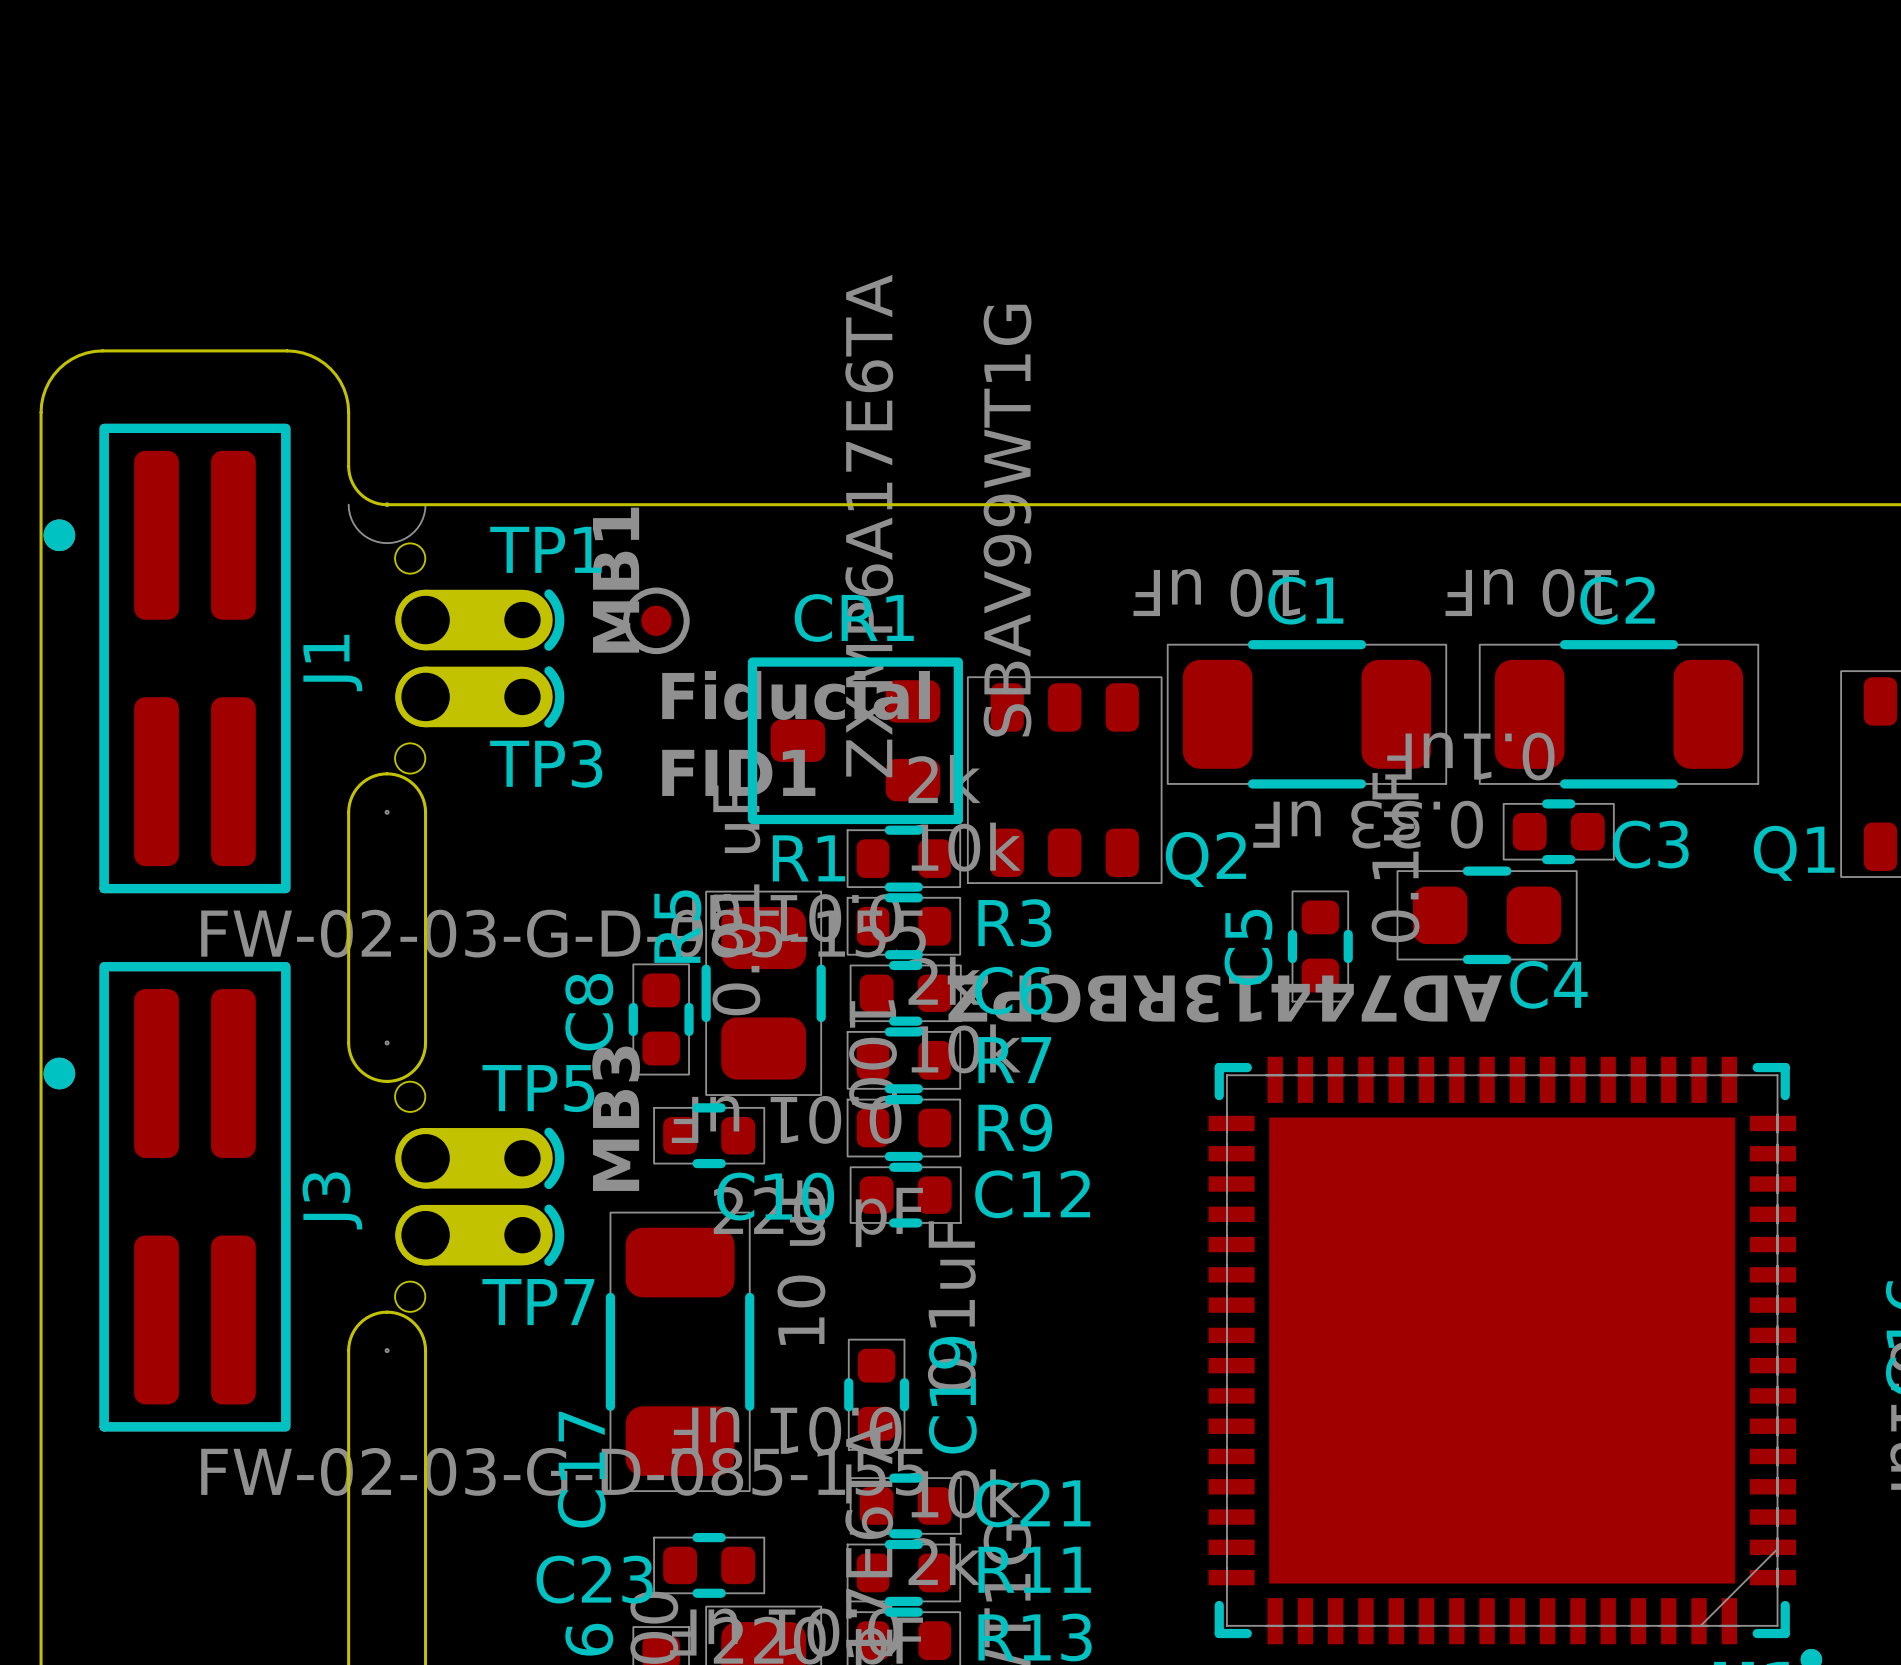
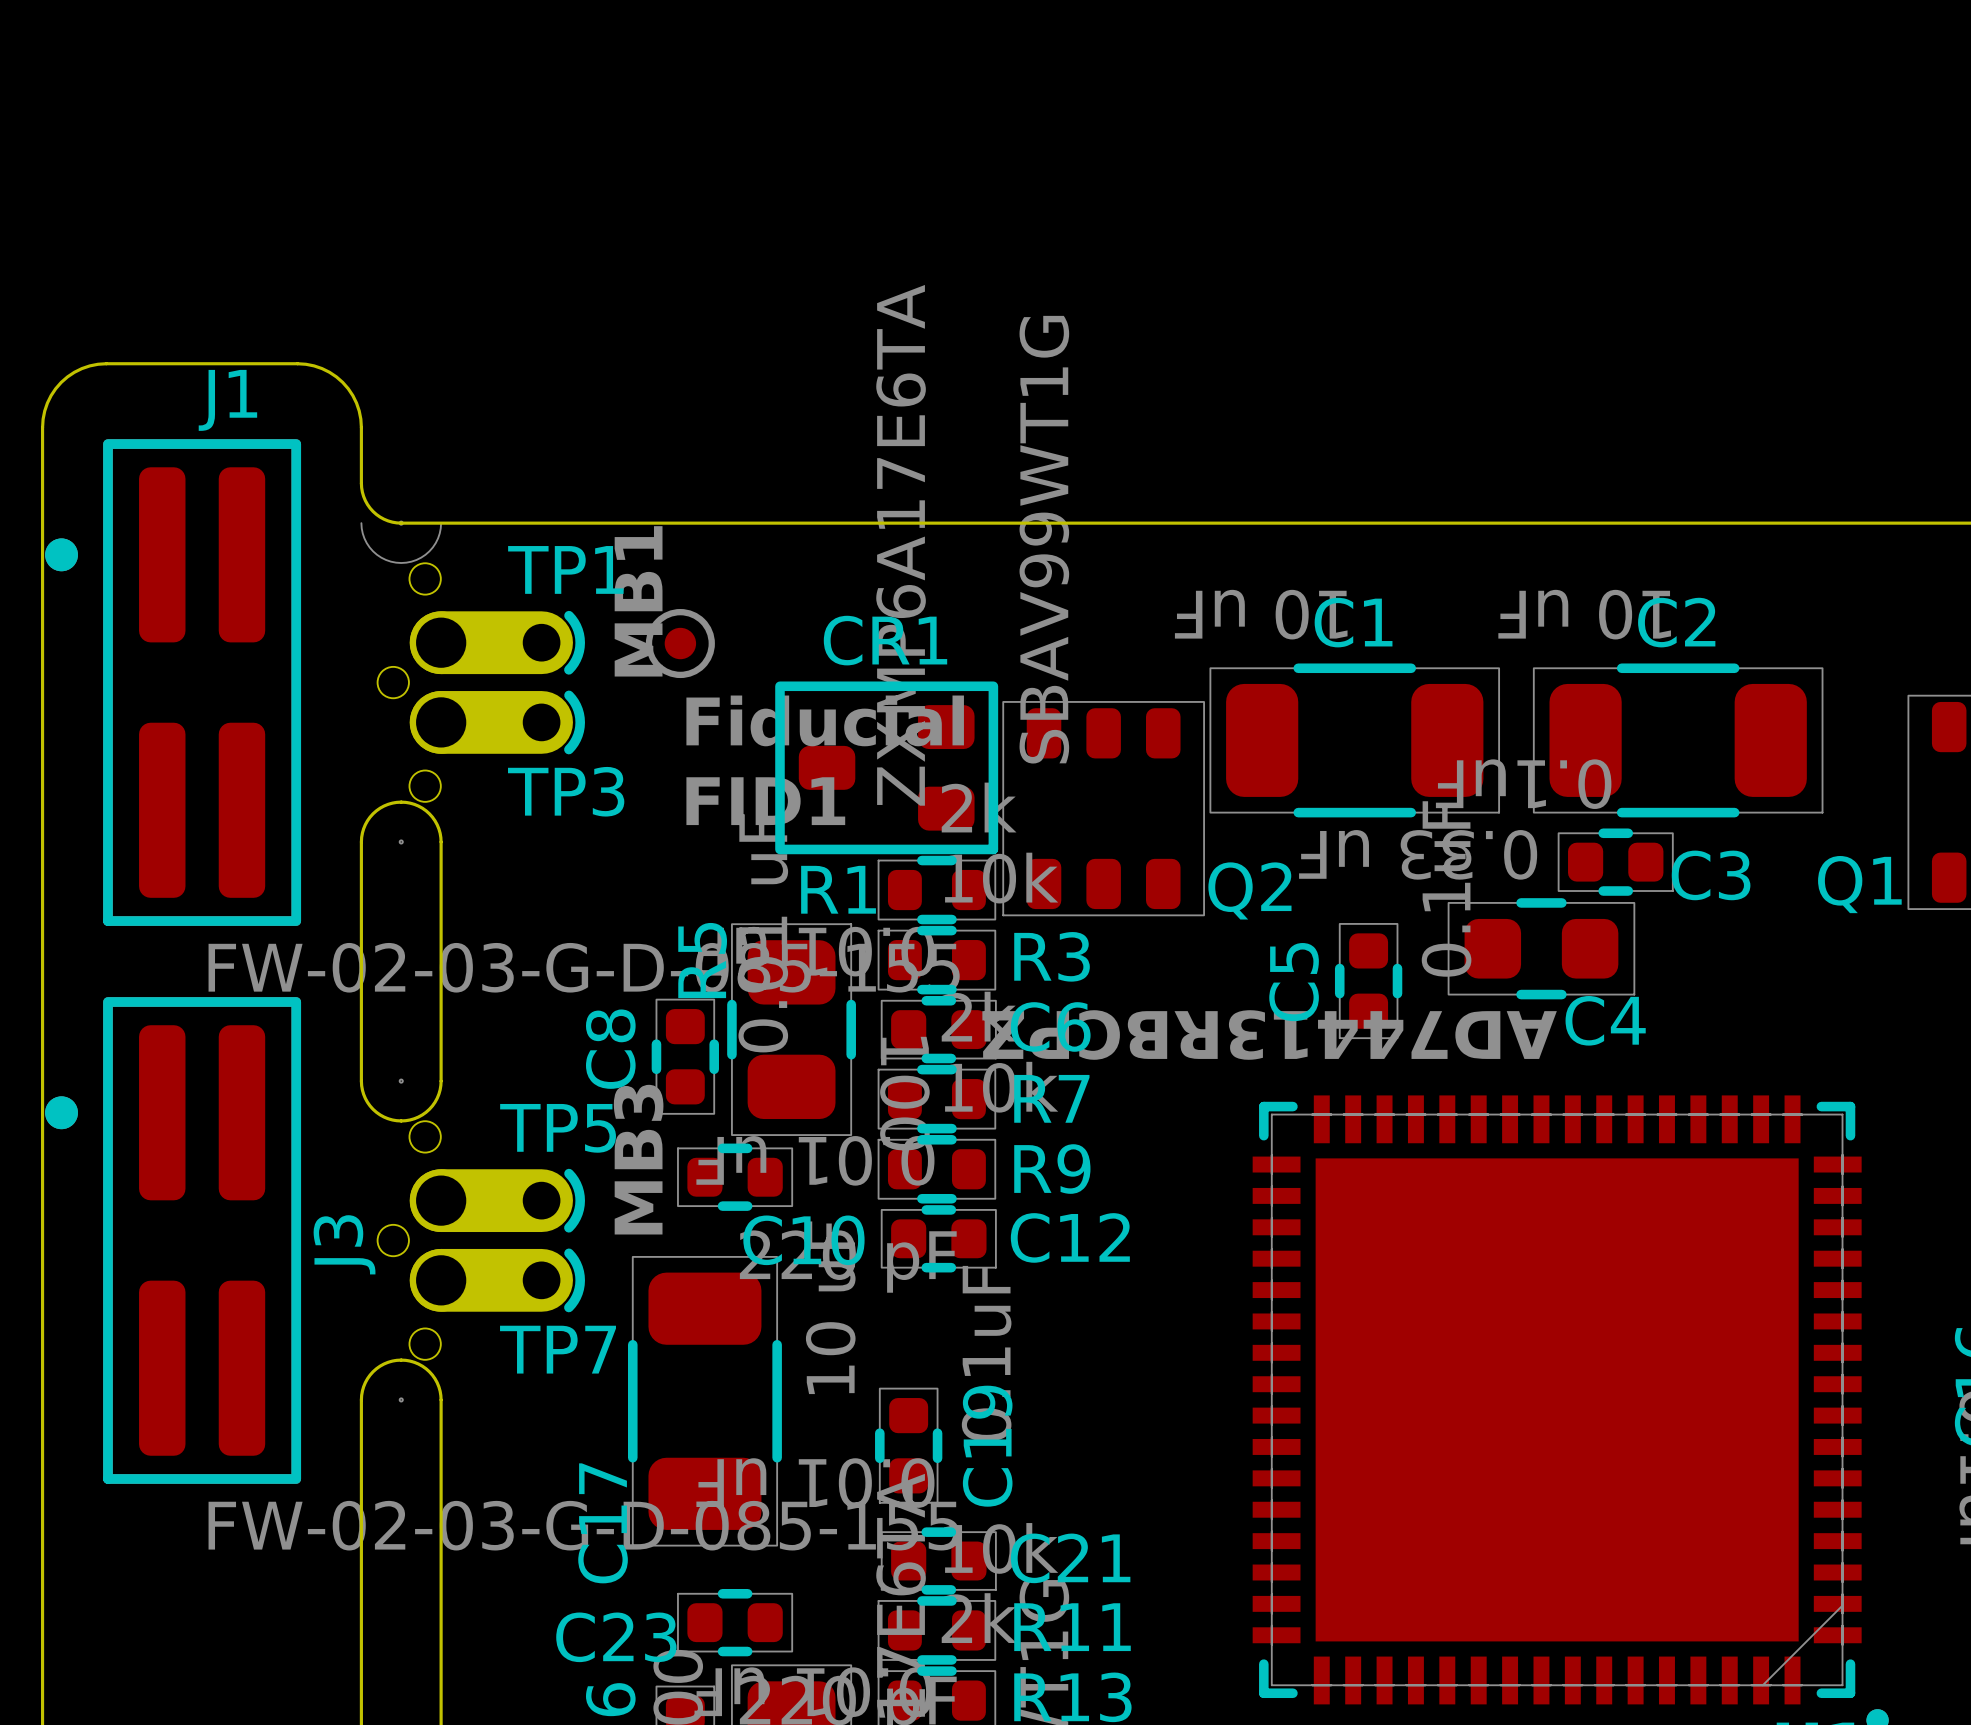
MB1 footprint: [347, 502, 427, 815] -> [360, 520, 442, 845]
J1 name rotation: 0° (332, 663) -> 90° clockwise (227, 400)
J1 name position: J1 (332, 663) -> J1 (227, 400)
MB3 footprint: [347, 1040, 427, 1353] -> [360, 1078, 442, 1403]

